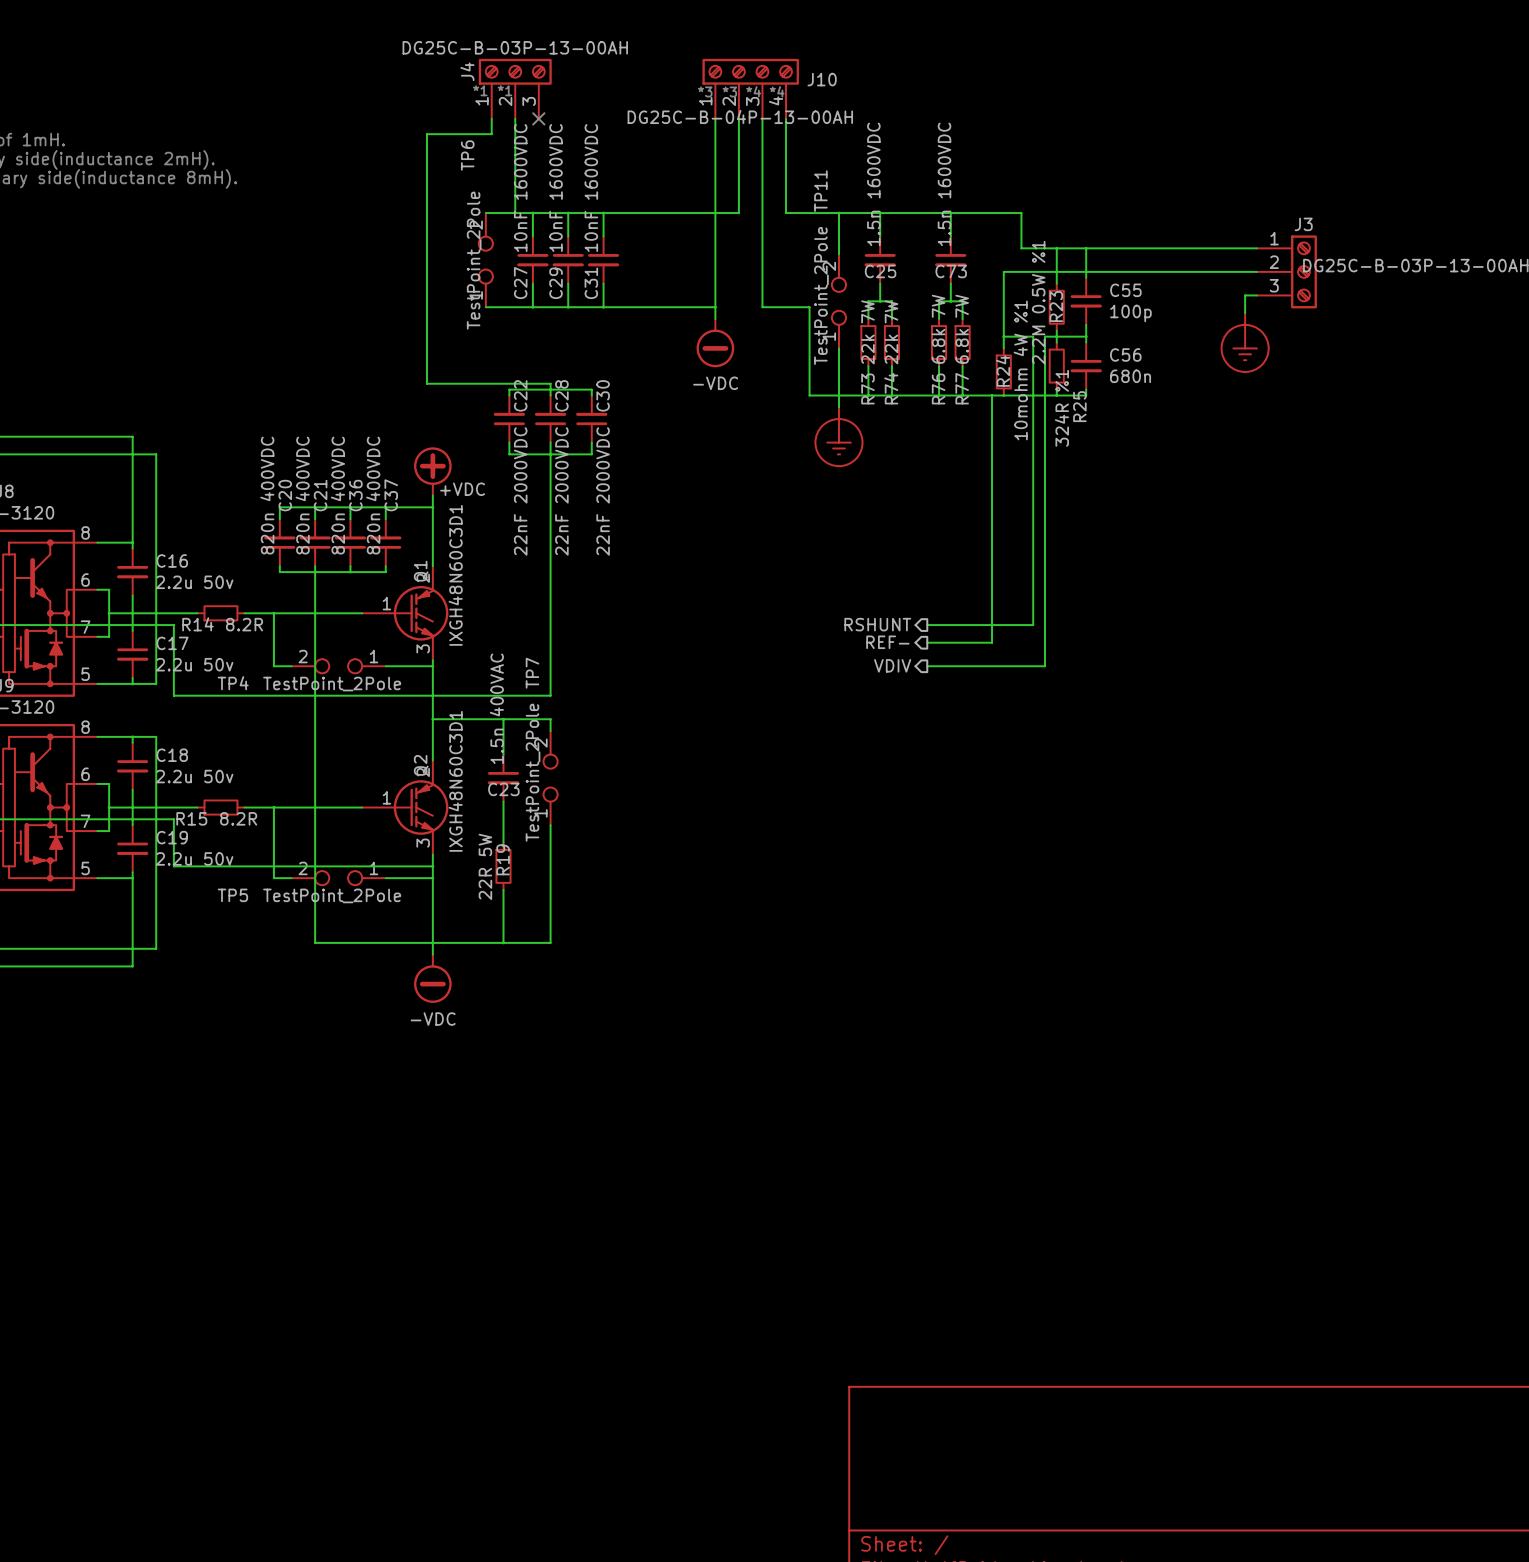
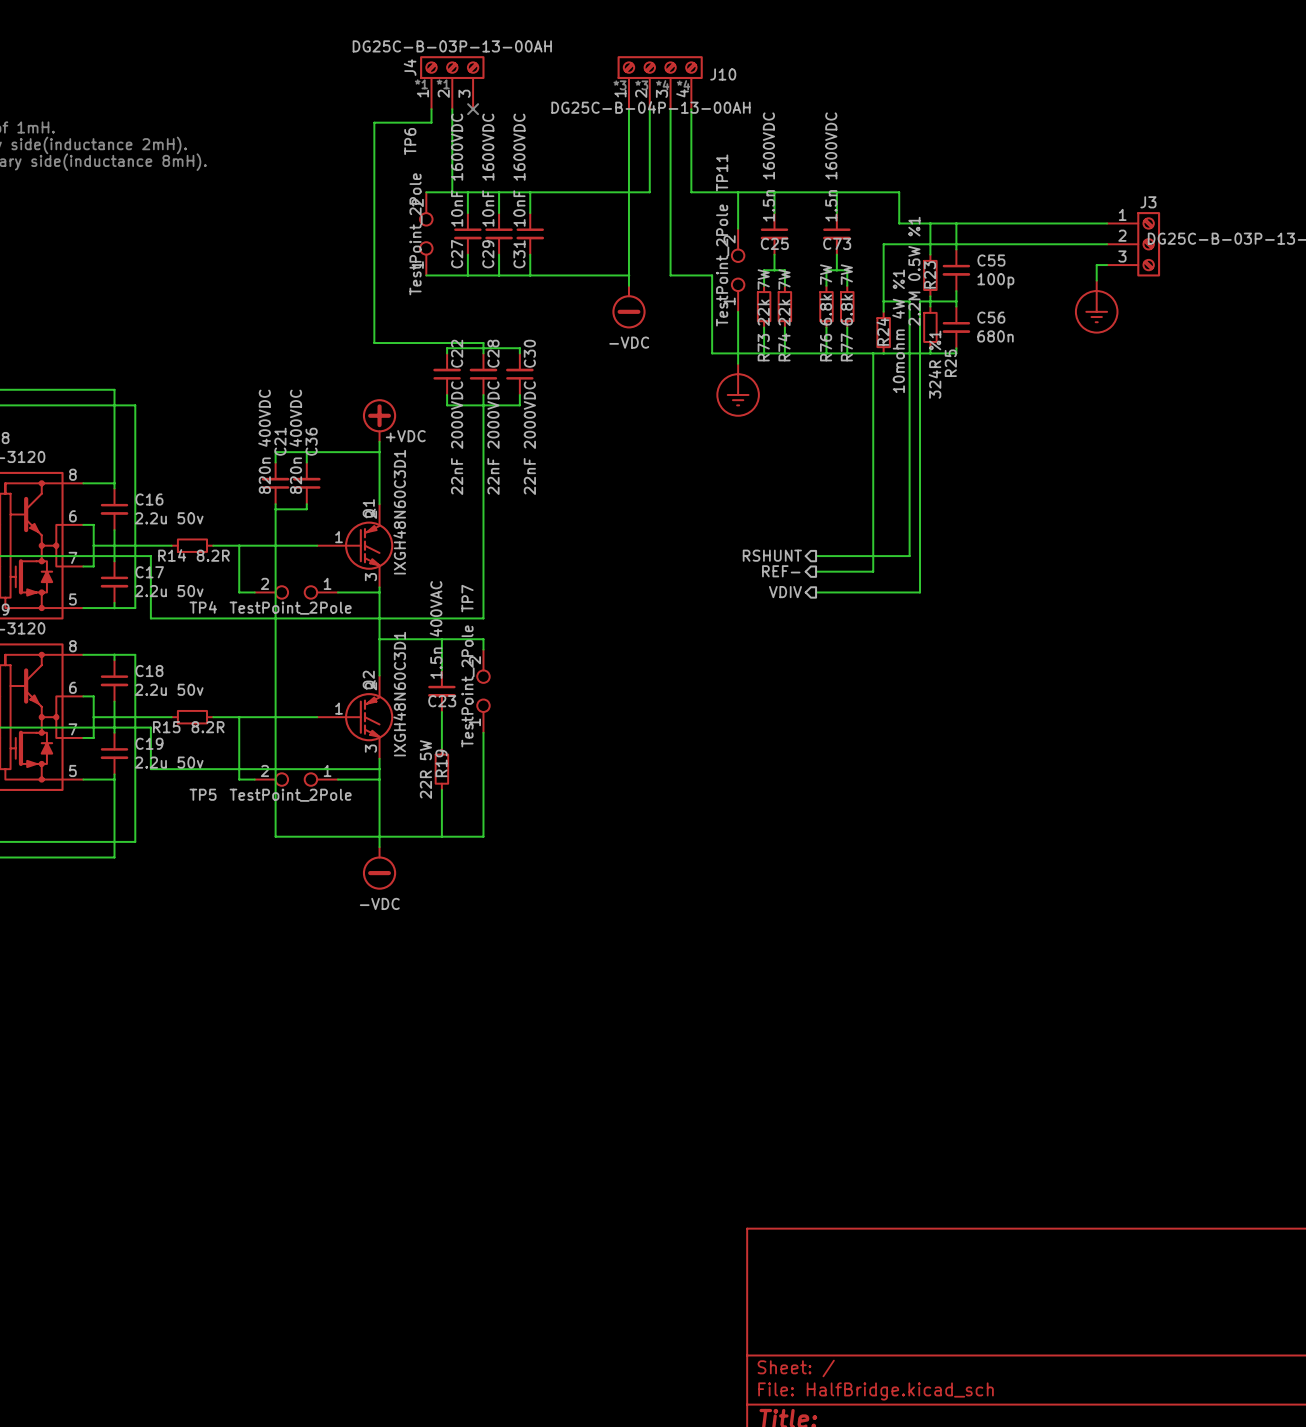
wire: (315, 507) (279, 507) (279, 519) -> none
wire: (385, 507) (385, 519) -> none
C20: 820n 400VDC (279, 542) -> none
C37: 820n 400VDC (385, 542) -> none
wire: (279, 566) (279, 572) (315, 572) -> none
wire: (385, 566) (385, 572) (350, 572) -> none

